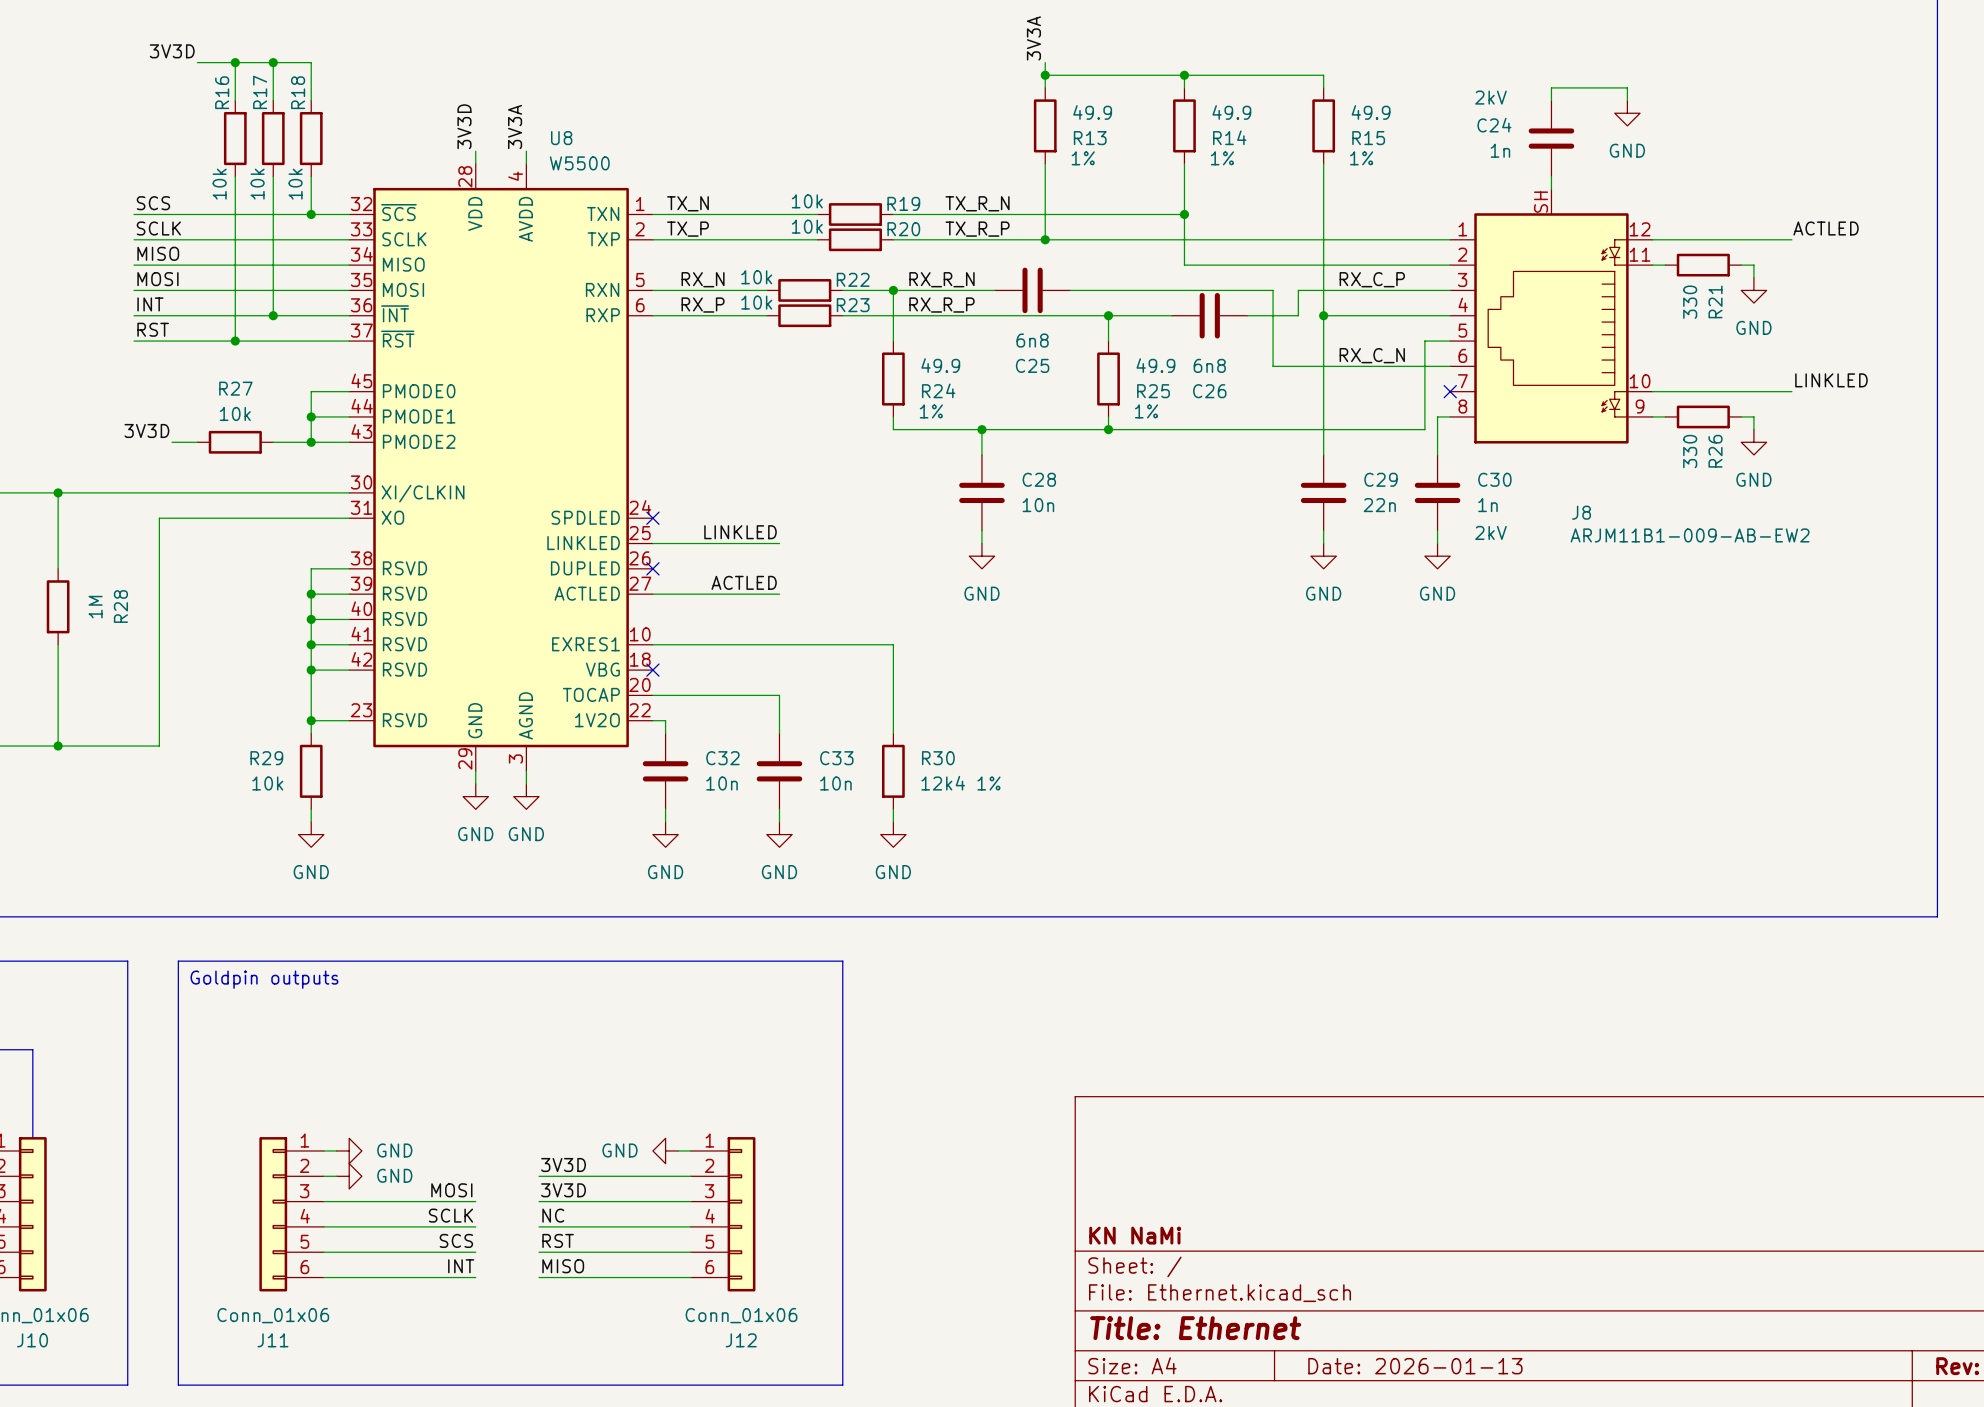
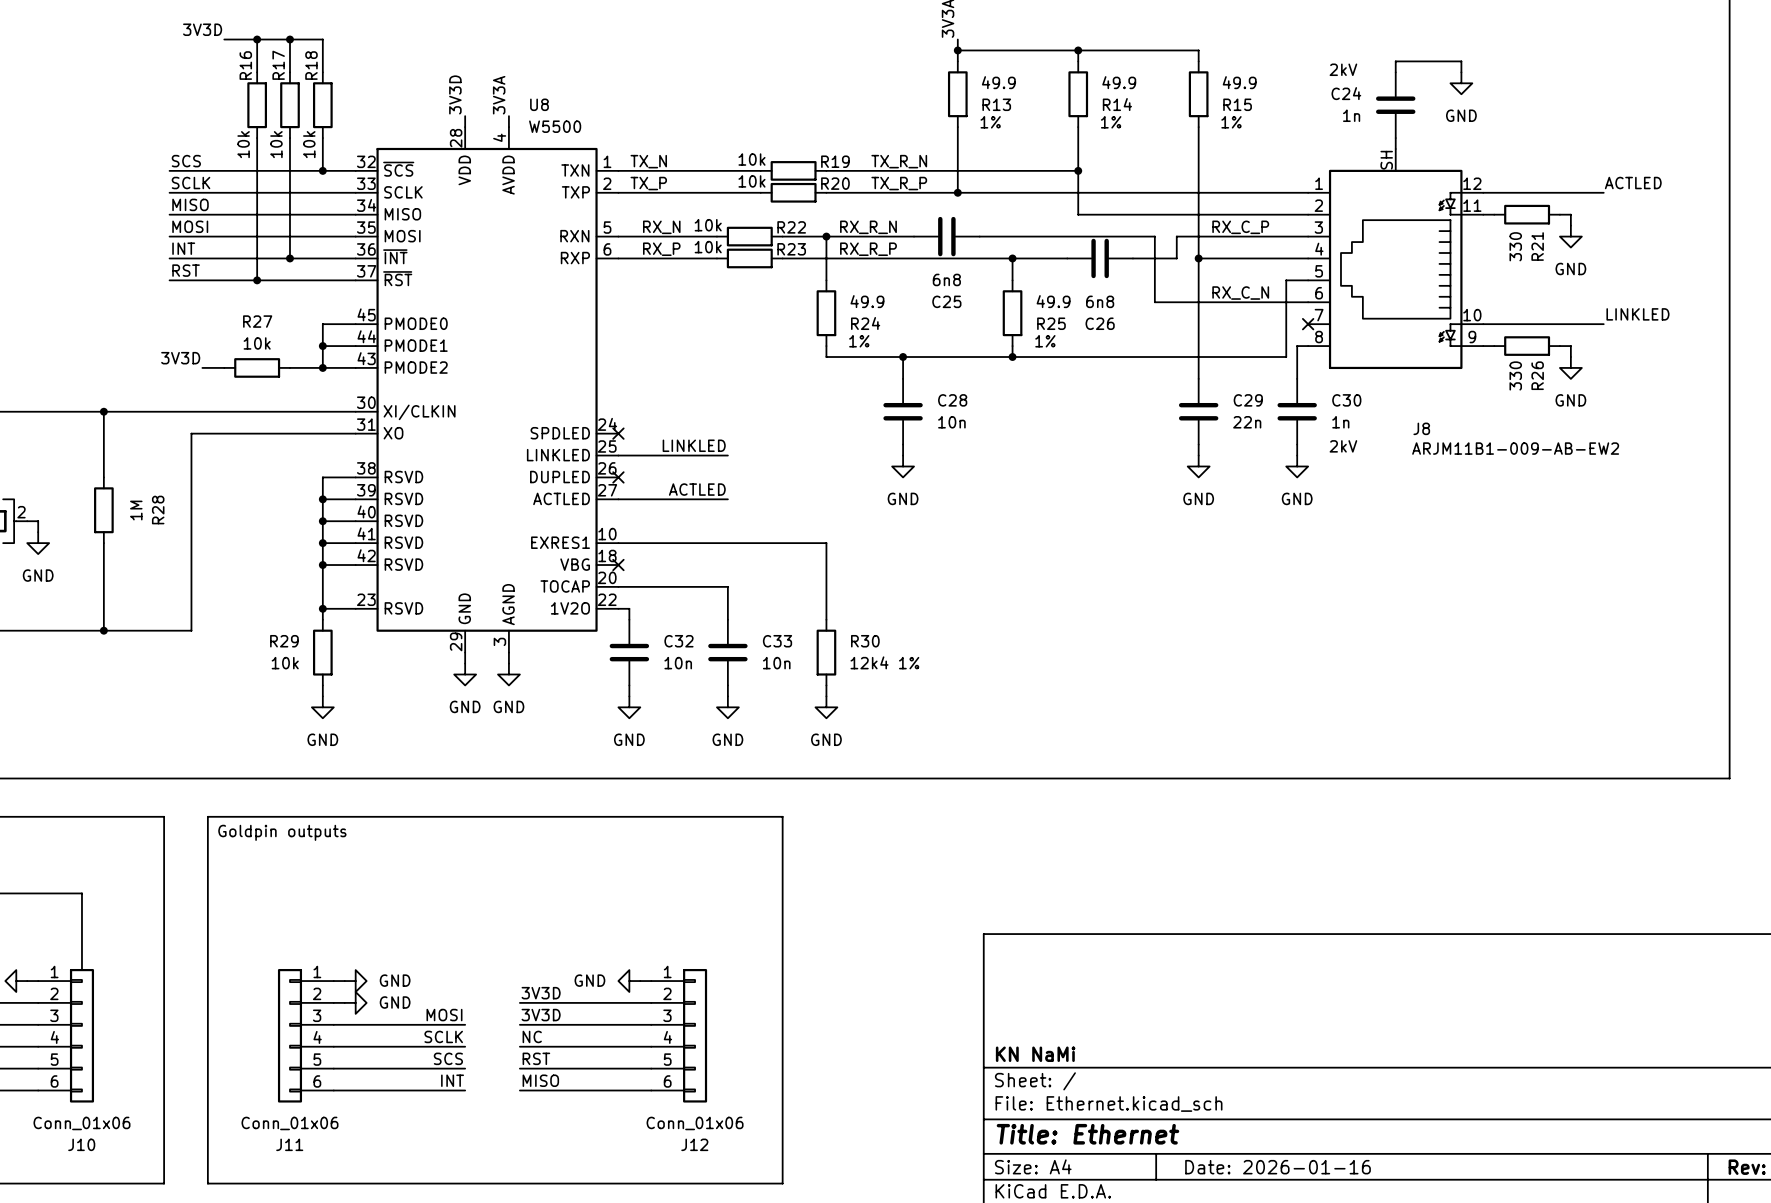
title block: Date: 2026-01-13 (1415, 1366) -> Date: 2026-01-16 (1278, 1167)

